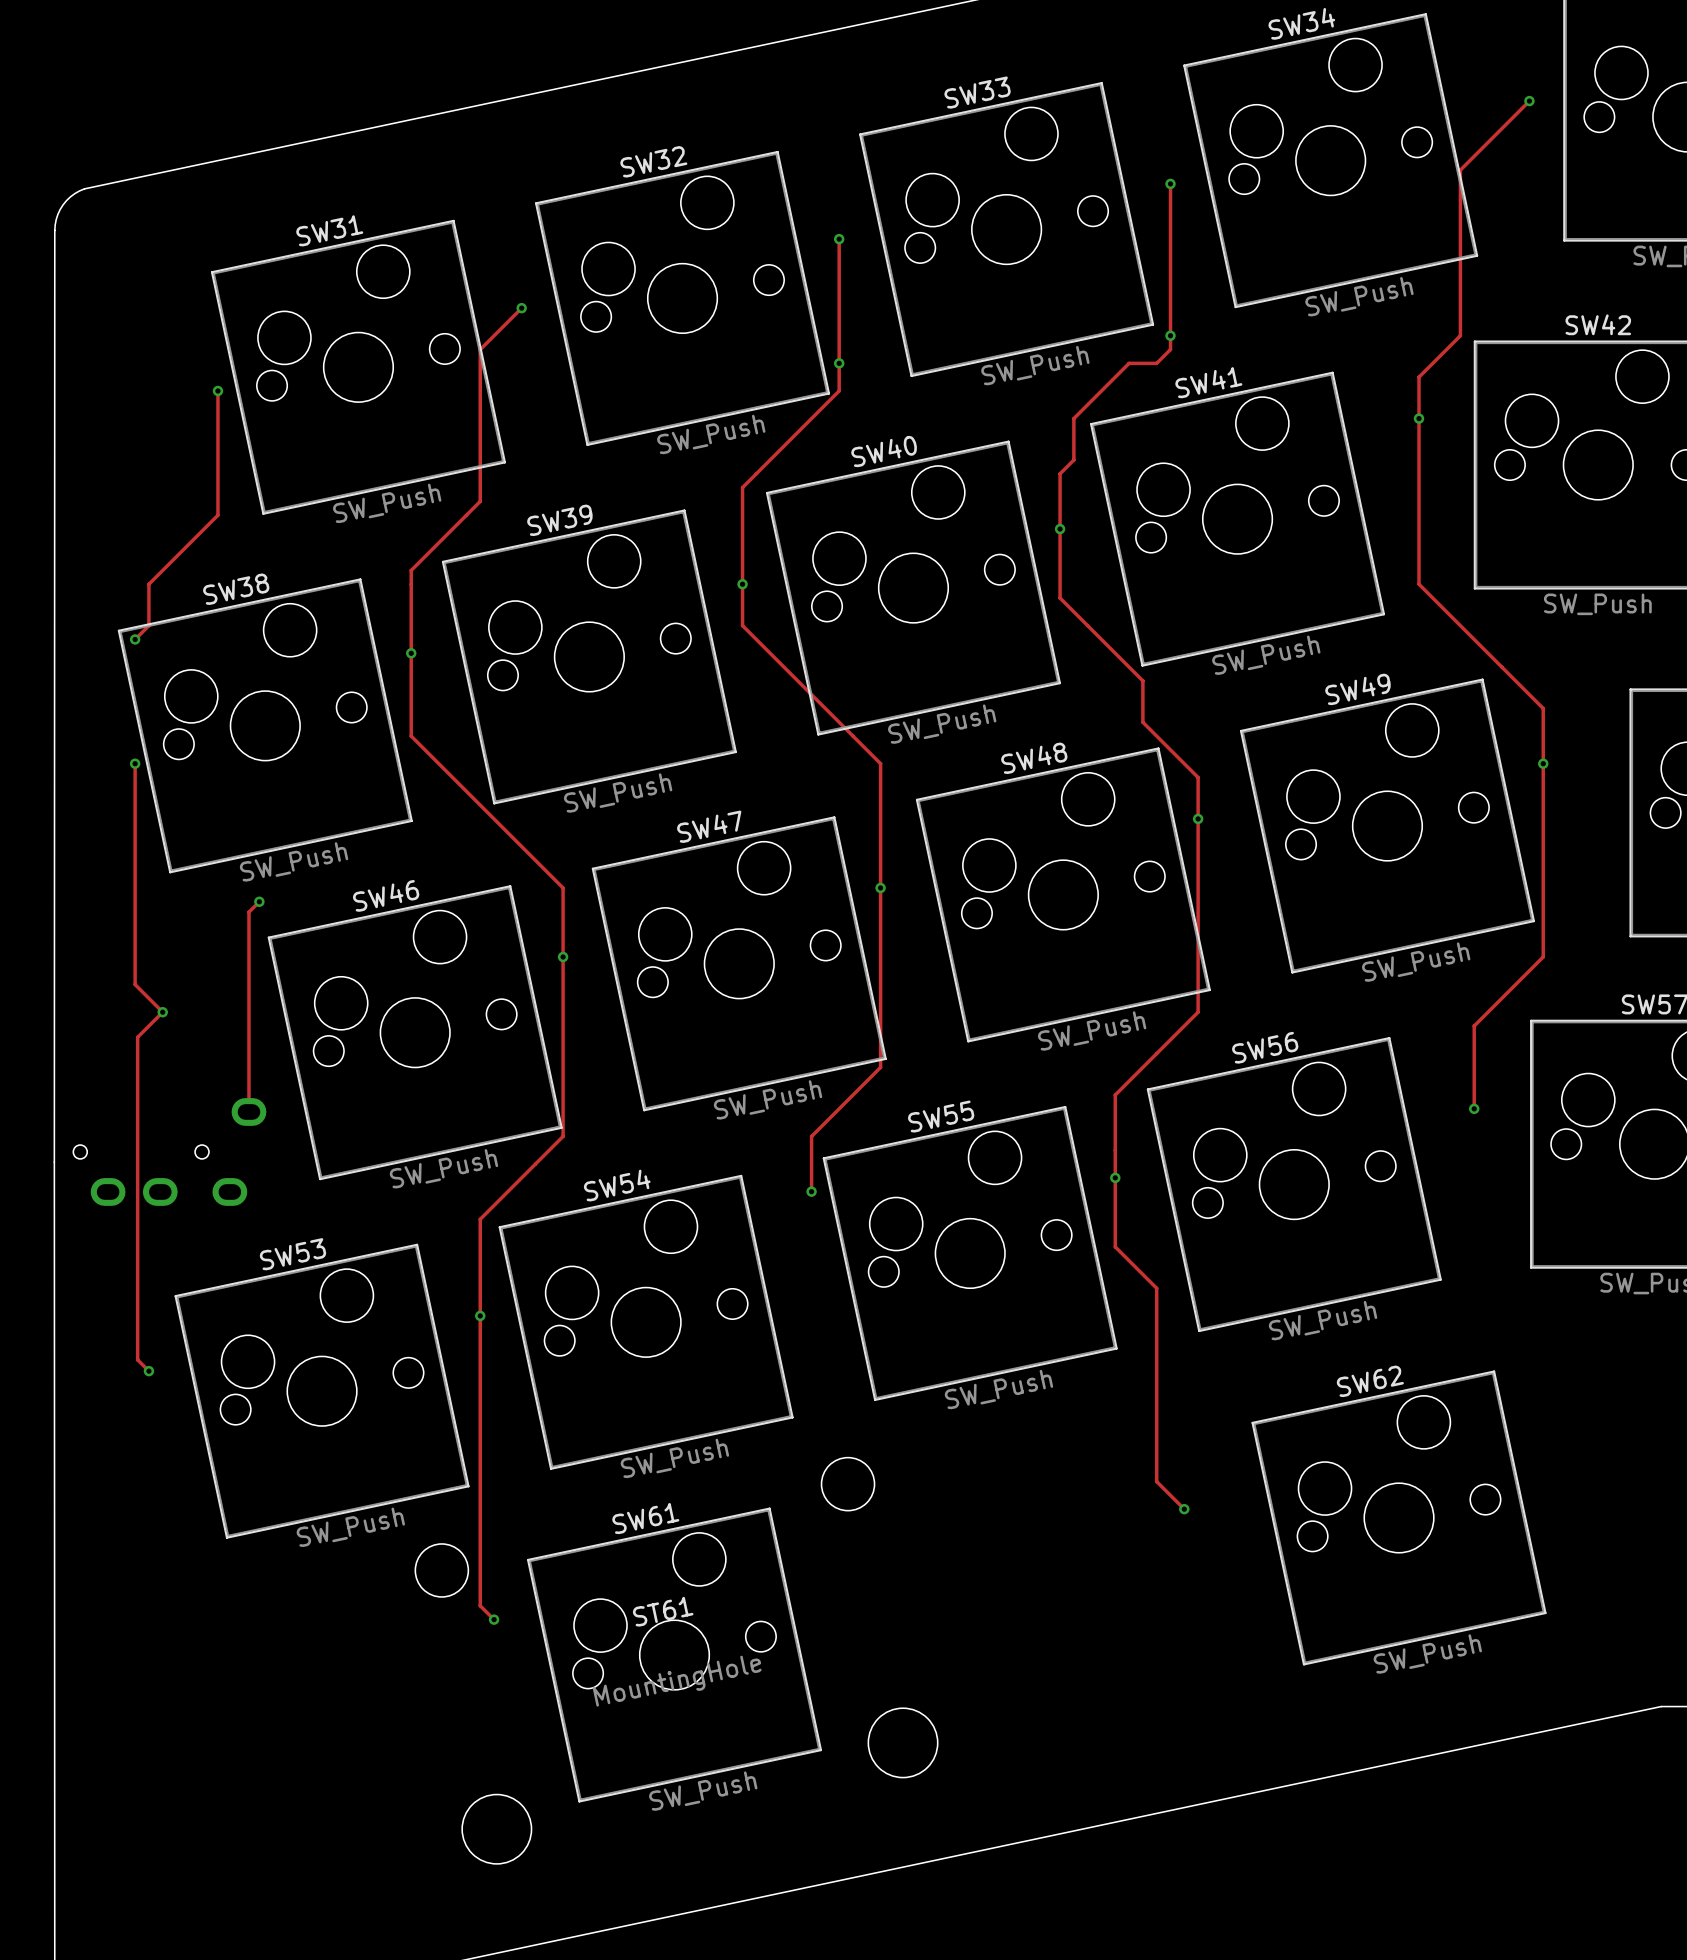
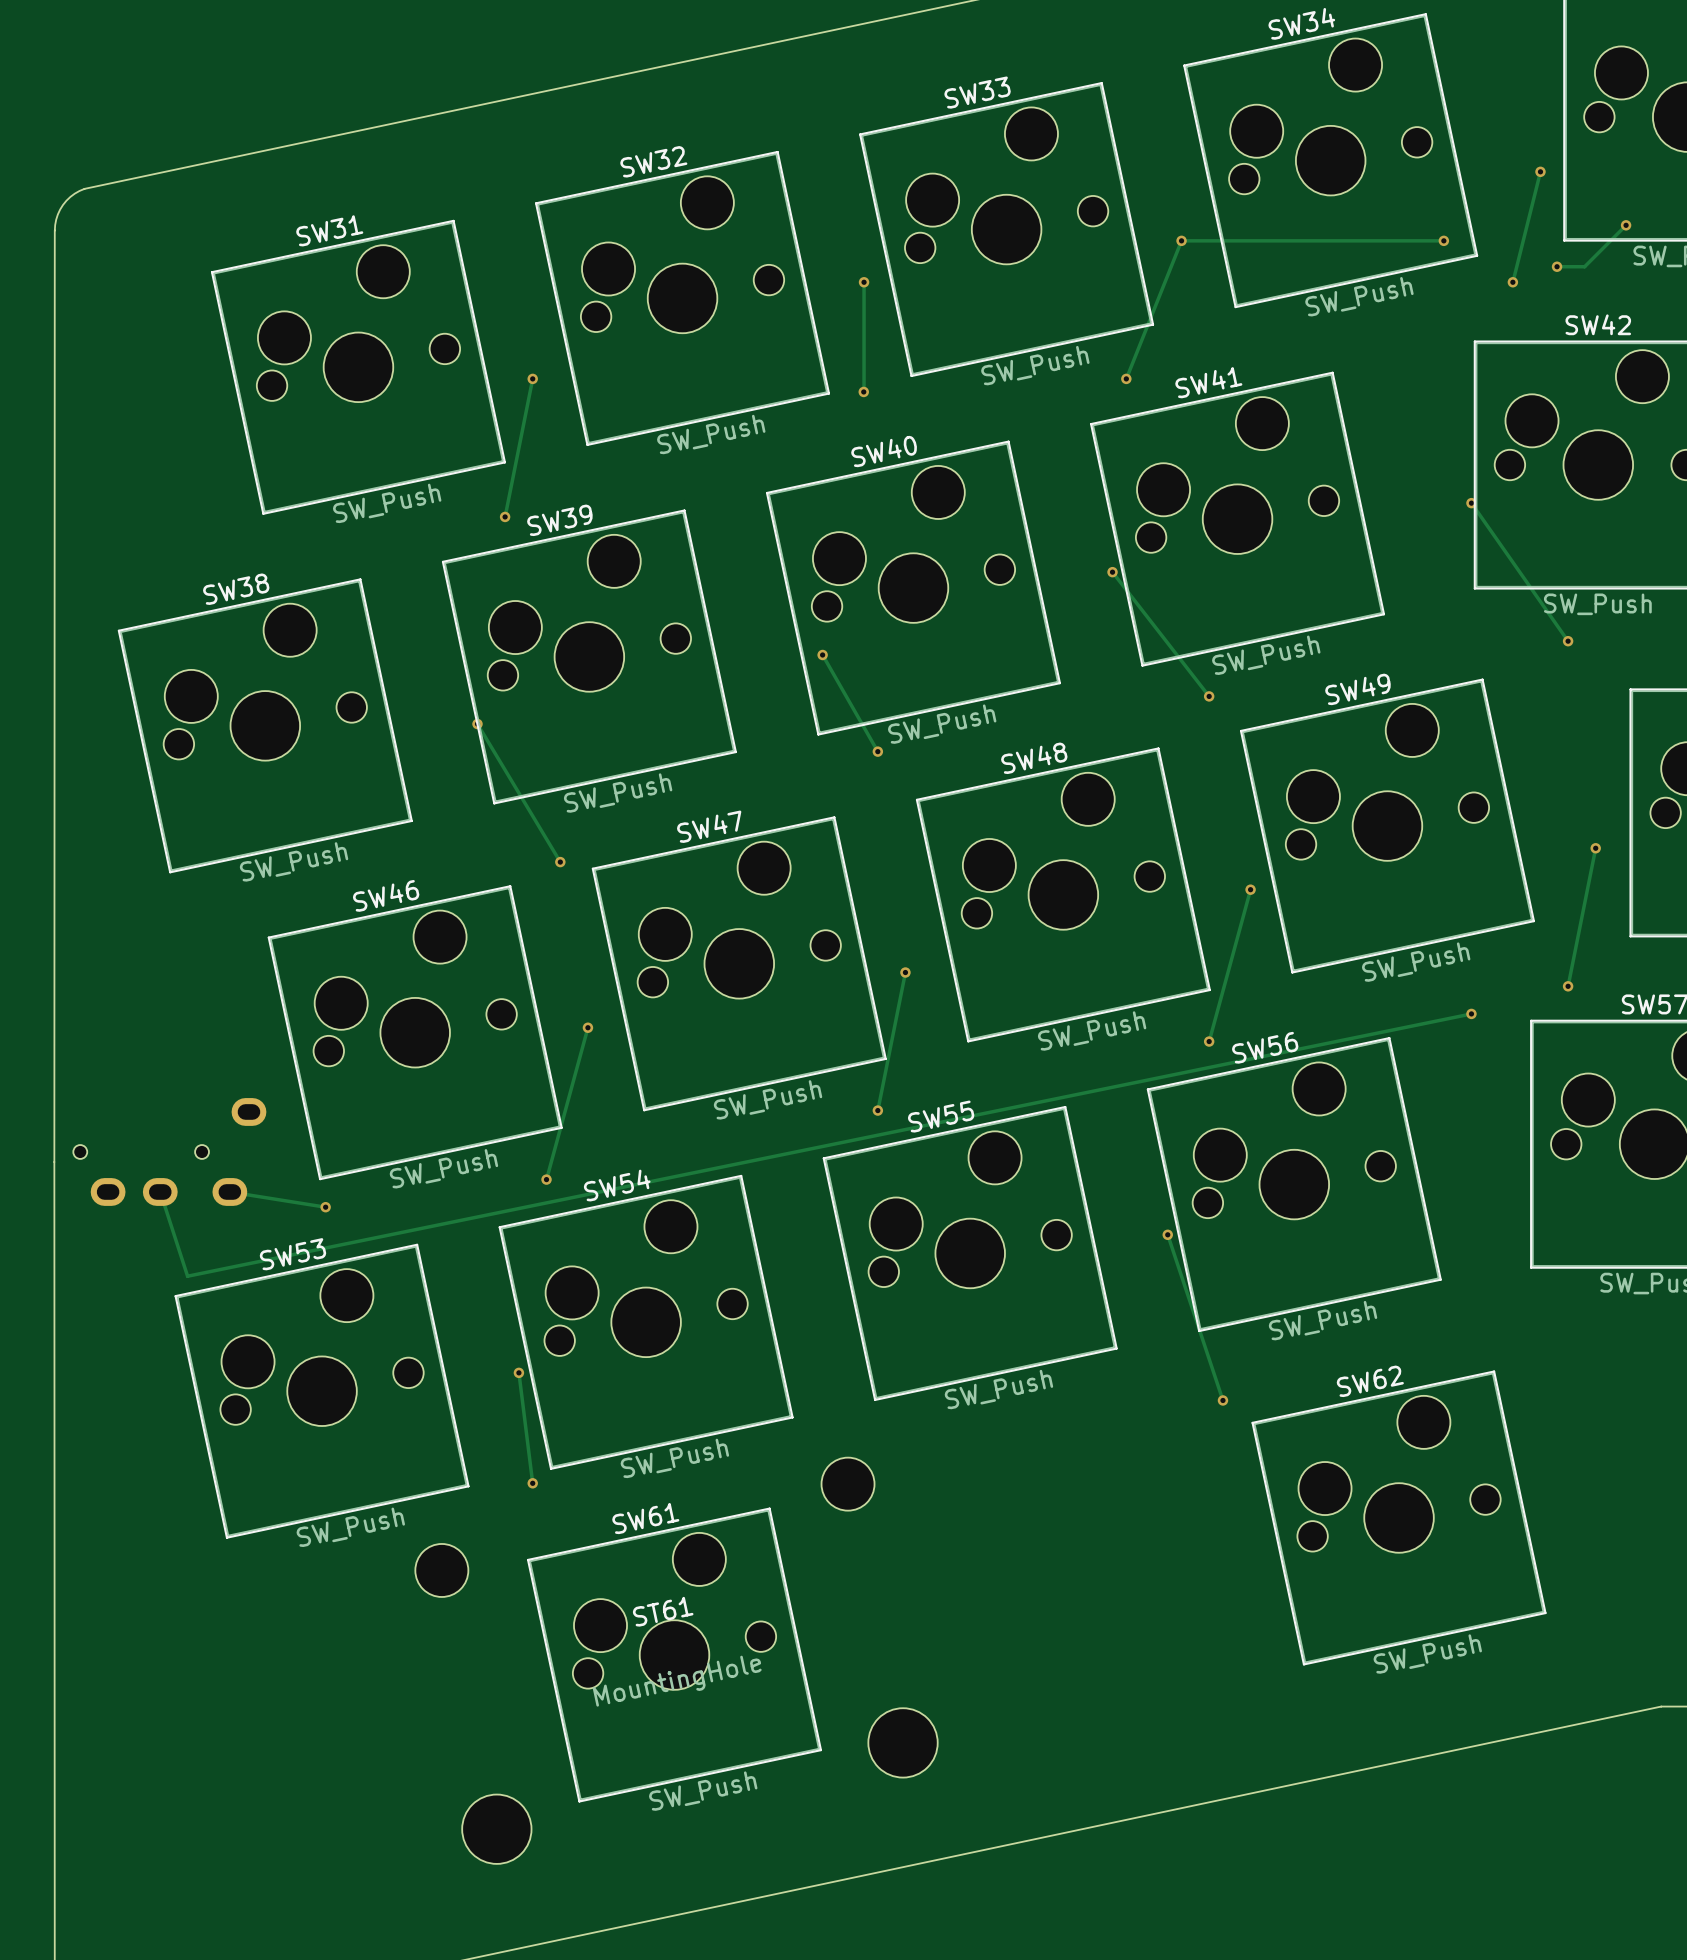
track: (1529, 101) (1460, 170) (1460, 335) (1419, 377) (1419, 584) (1543, 708) (1543, 956) (1474, 1026) (1474, 1108) -> none
via position: (1529, 101) -> (1540, 171)
track: none -> (1540, 171) (1512, 282)
track: (1170, 183) (1170, 349) (1156, 363) (1129, 363) (1073, 418) (1073, 460) (1060, 473) (1060, 598) (1142, 680) (1142, 722) (1198, 777) (1198, 1012) (1115, 1095) (1115, 1246) (1156, 1288) (1156, 1481) (1184, 1509) -> none
via: (1170, 183) -> none
track: none -> (1626, 225) (1584, 266) (1557, 266)
via: none -> (1626, 225)
track: (839, 239) (839, 390) (742, 487) (742, 625) (880, 763) (880, 1067) (811, 1136) (811, 1191) -> none
via: (839, 239) -> none
via: none -> (1181, 240)
track: none -> (1443, 240) (1181, 240) (1126, 378)
via: none -> (1443, 240)
via: none -> (1557, 266)
track: none -> (864, 282) (863, 391)
via: none -> (864, 282)
via: none -> (1512, 282)
track: (521, 308) (480, 349) (480, 501) (411, 570) (411, 736) (563, 887) (563, 1136) (480, 1219) (480, 1605) (494, 1619) -> none
via position: (521, 308) -> (532, 378)
via: (1170, 335) -> none
via position: (839, 363) -> (863, 391)
track: none -> (532, 378) (505, 516)
via: none -> (1126, 378)
track: (217, 390) (217, 515) (148, 584) (148, 625) (135, 639) -> none
via: (217, 390) -> none
via: (1419, 418) -> none
track: none -> (1471, 503) (1568, 641)
via: none -> (1471, 503)
via: none -> (505, 516)
via position: (1060, 529) -> (1112, 572)
track: none -> (1112, 572) (1209, 696)
via: (742, 584) -> none
via: (135, 639) -> none
via: none -> (1568, 641)
via: (411, 653) -> none
track: none -> (822, 655) (877, 751)
via: none -> (822, 655)
via: none -> (1209, 696)
track: none -> (477, 724) (560, 862)
via: none -> (477, 724)
via: none -> (877, 751)
track: (135, 763) (135, 984) (162, 1012) (137, 1037) (137, 1359) (148, 1371) -> none
via: (135, 763) -> none
via: (1543, 763) -> none
via: (1198, 818) -> none
track: none -> (1595, 848) (1568, 986)
via: none -> (1595, 848)
via: none -> (560, 862)
via: (880, 887) -> none
track: none -> (1250, 889) (1209, 1041)
via: none -> (1250, 889)
track: (259, 901) (248, 912) (248, 1111) -> none
via: (259, 901) -> none
via: (563, 956) -> none
track: none -> (905, 972) (877, 1110)
via: none -> (905, 972)
via: none -> (1568, 986)
via: (162, 1012) -> none
track: none -> (1471, 1013) (187, 1276) (160, 1191)
via: none -> (1471, 1013)
track: none -> (587, 1027) (546, 1179)
via: none -> (587, 1027)
via: none -> (1209, 1041)
via: (1474, 1108) -> none
via: none -> (877, 1110)
via position: (1115, 1177) -> (1167, 1234)
via: none -> (546, 1179)
track: none -> (229, 1191) (325, 1207)
via: (811, 1191) -> none
via: none -> (325, 1207)
track: none -> (1167, 1234) (1222, 1400)
via position: (480, 1315) -> (518, 1372)
via: (148, 1371) -> none
track: none -> (518, 1372) (532, 1483)
via: none -> (1222, 1400)
via: none -> (532, 1483)
via: (1184, 1509) -> none
via: (494, 1619) -> none

